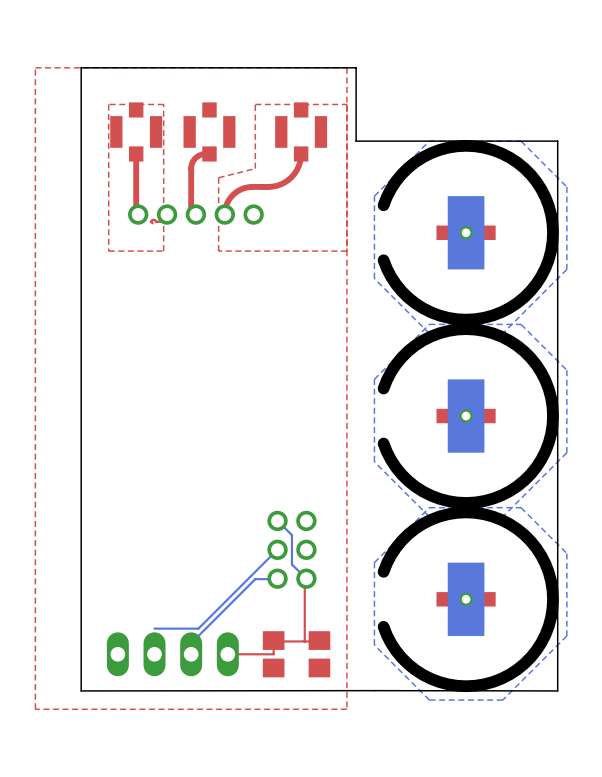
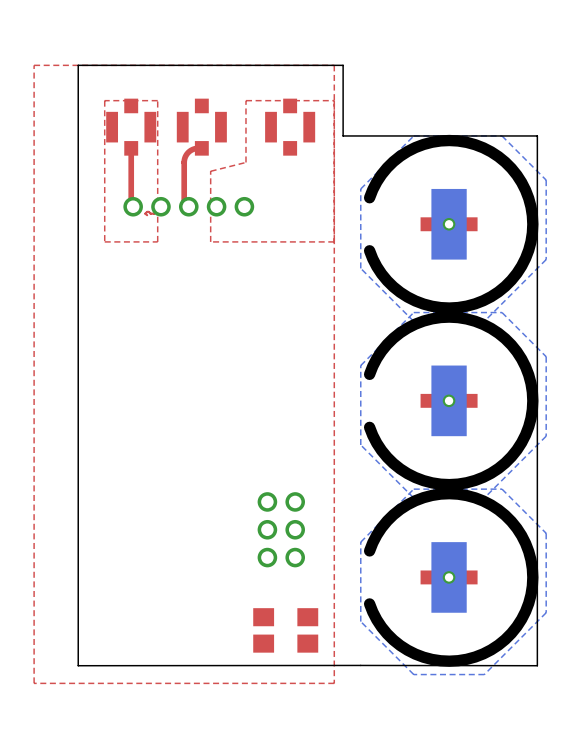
top track: (301, 153) (298, 166) (288, 180) (276, 185) (248, 187) (238, 190) (228, 200) (224, 214) -> none
bottom track: (277, 520) (291, 535) (291, 564) (306, 578) -> none
bottom track: (277, 549) (198, 628) (154, 628) -> none
bottom track: (277, 578) (255, 579) (191, 643) (191, 654) -> none
top track: (306, 578) (304, 579) (304, 641) -> none
top track: (273, 640) (273, 654) (227, 654) -> none
top track: (319, 640) (273, 641) -> none
part: (172, 654) -> none

